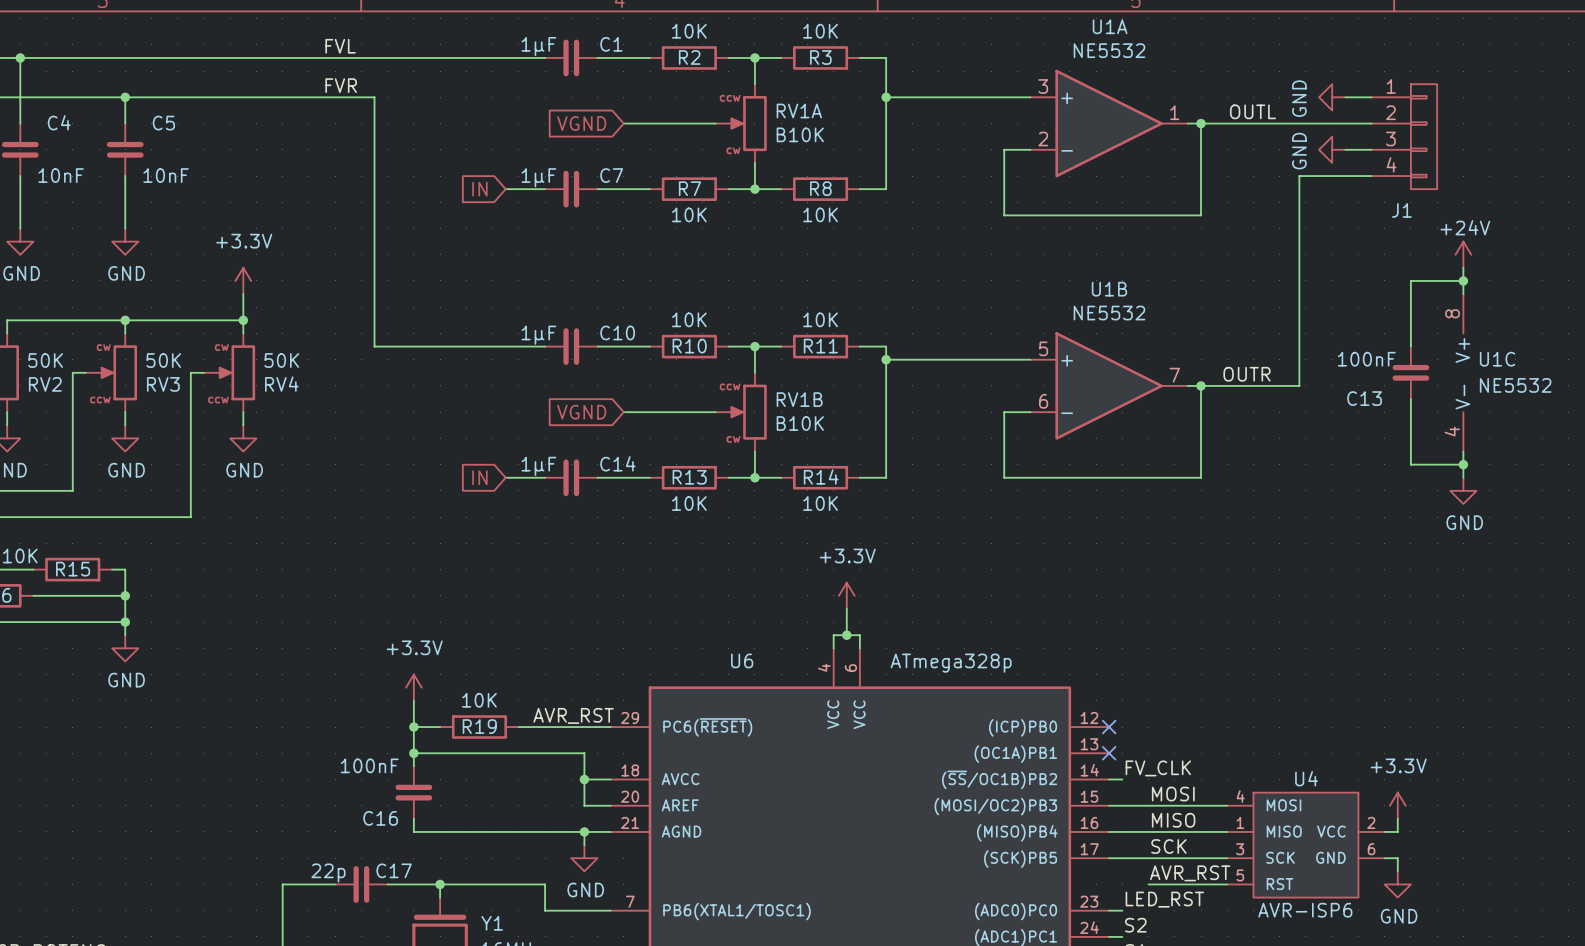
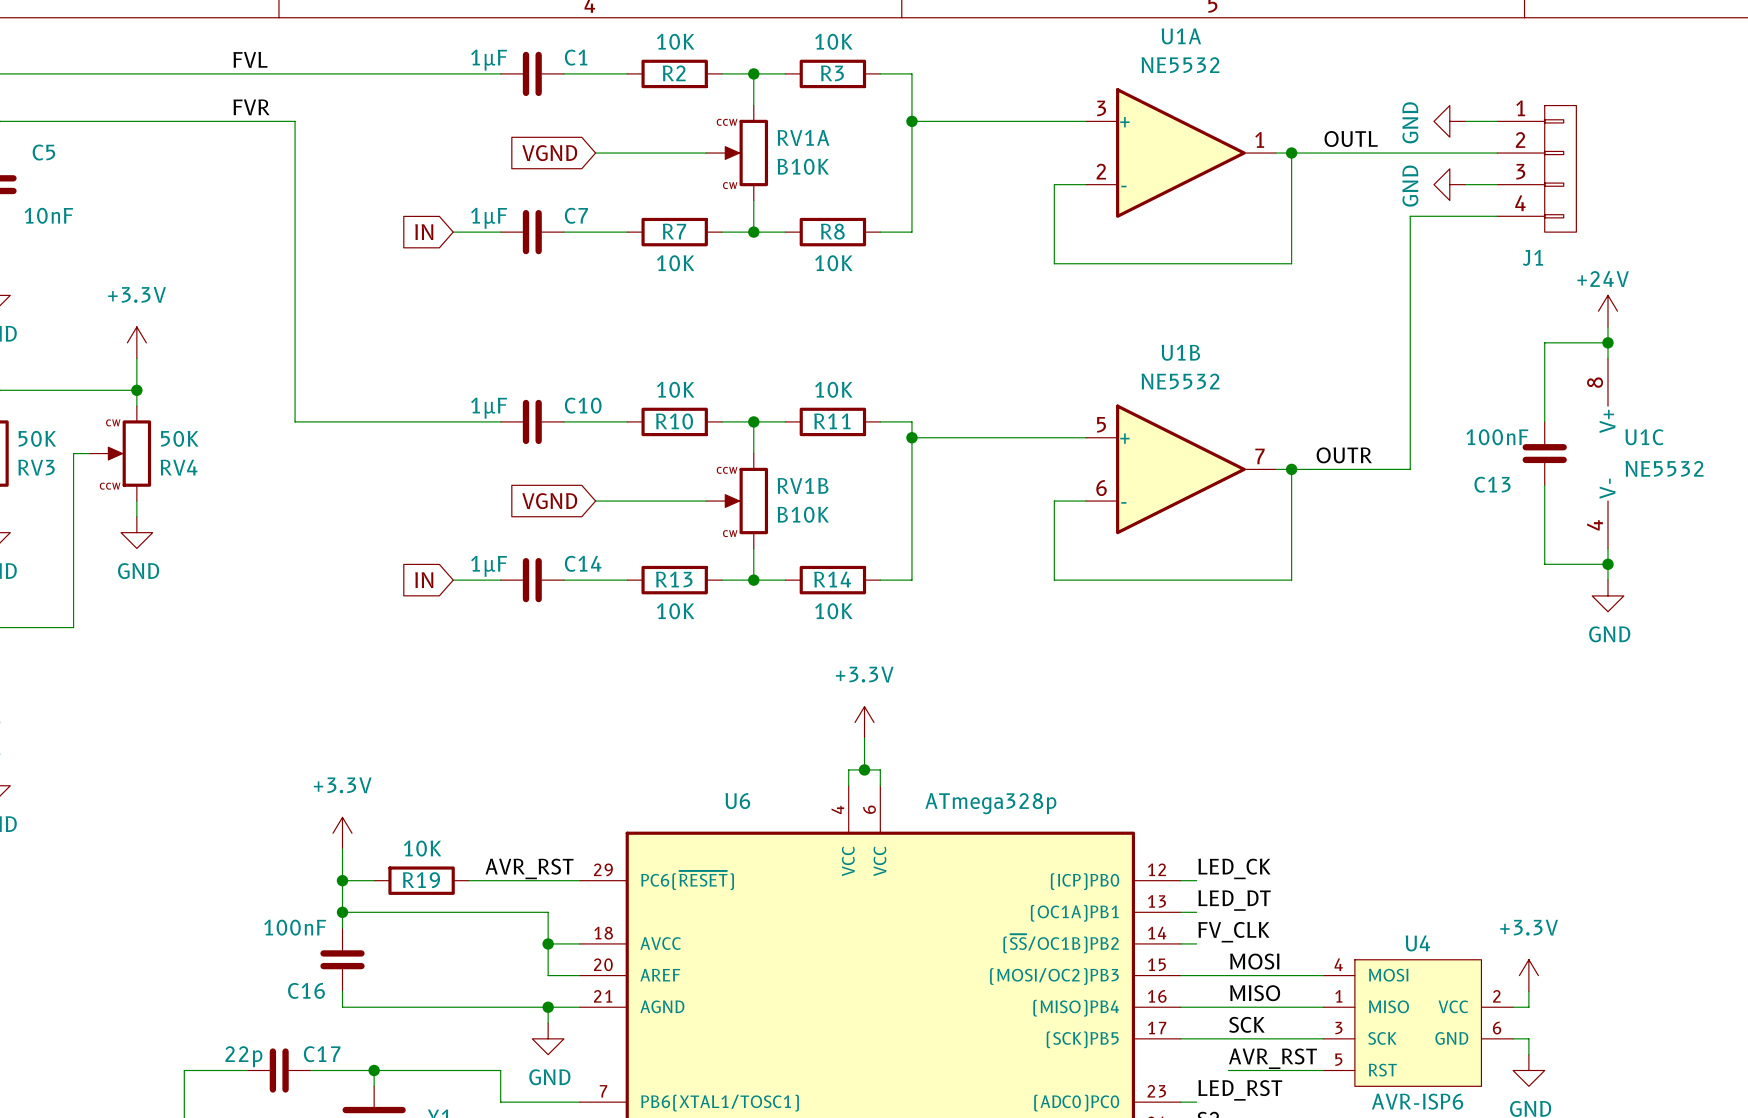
label: none -> LED_CK (1234, 868)
wire: none -> (1180, 880) (1196, 880)
no-connect mark: (1109, 727) -> none
label: none -> LED_DT (1234, 900)
wire: none -> (1180, 912) (1196, 912)
no-connect mark: (1109, 753) -> none

